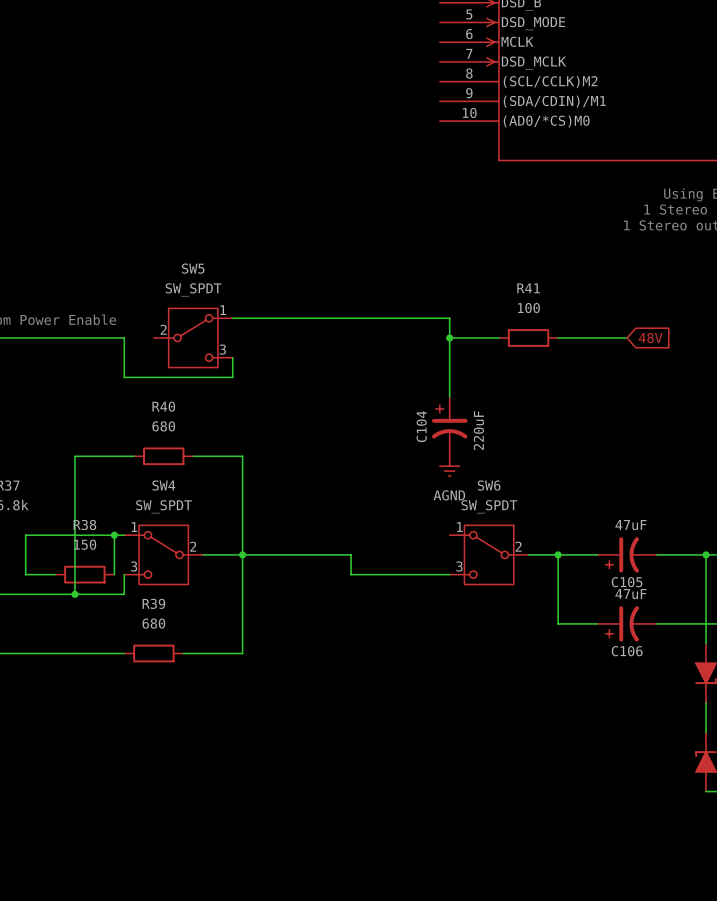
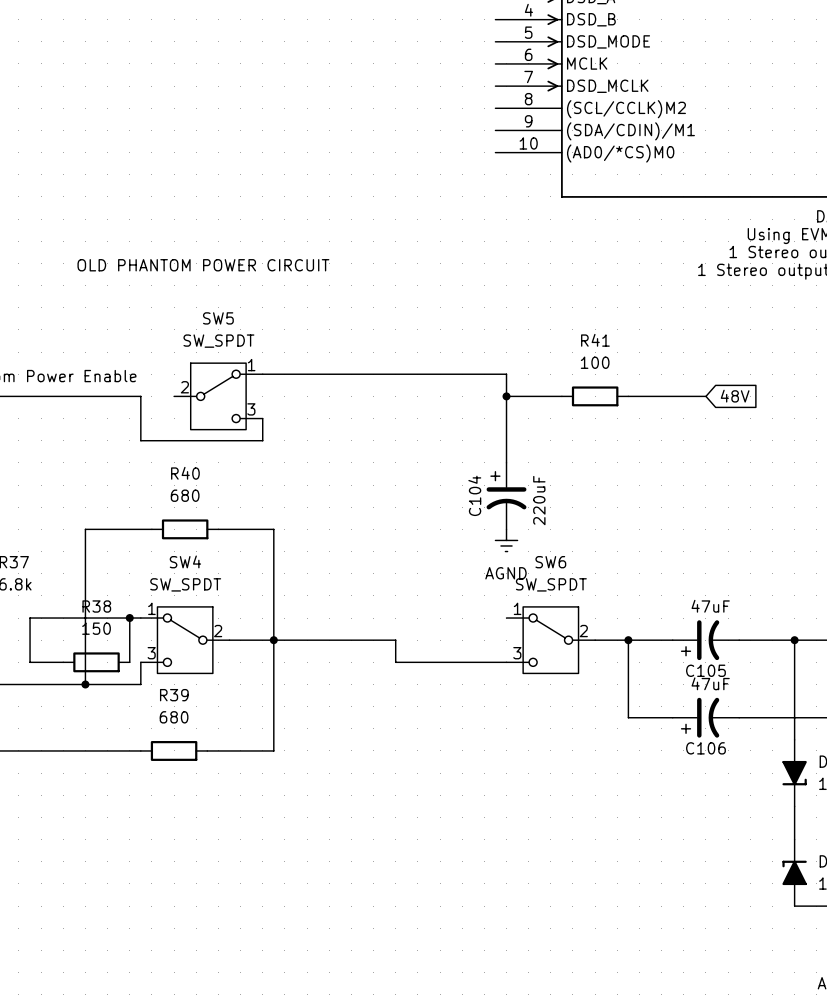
text: none -> OLD PHANTOM POWER CIRCUIT (203, 265)

